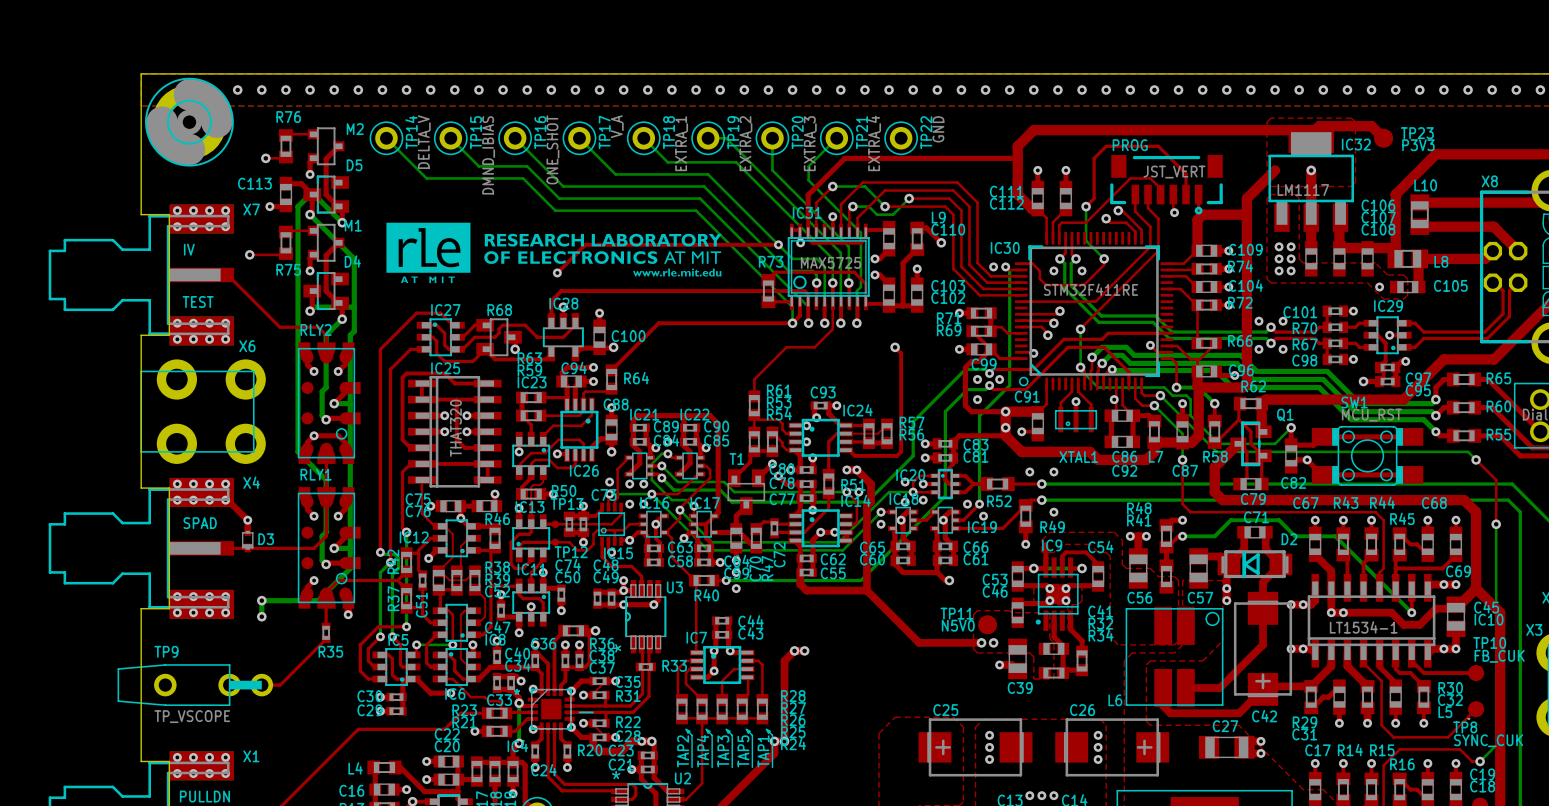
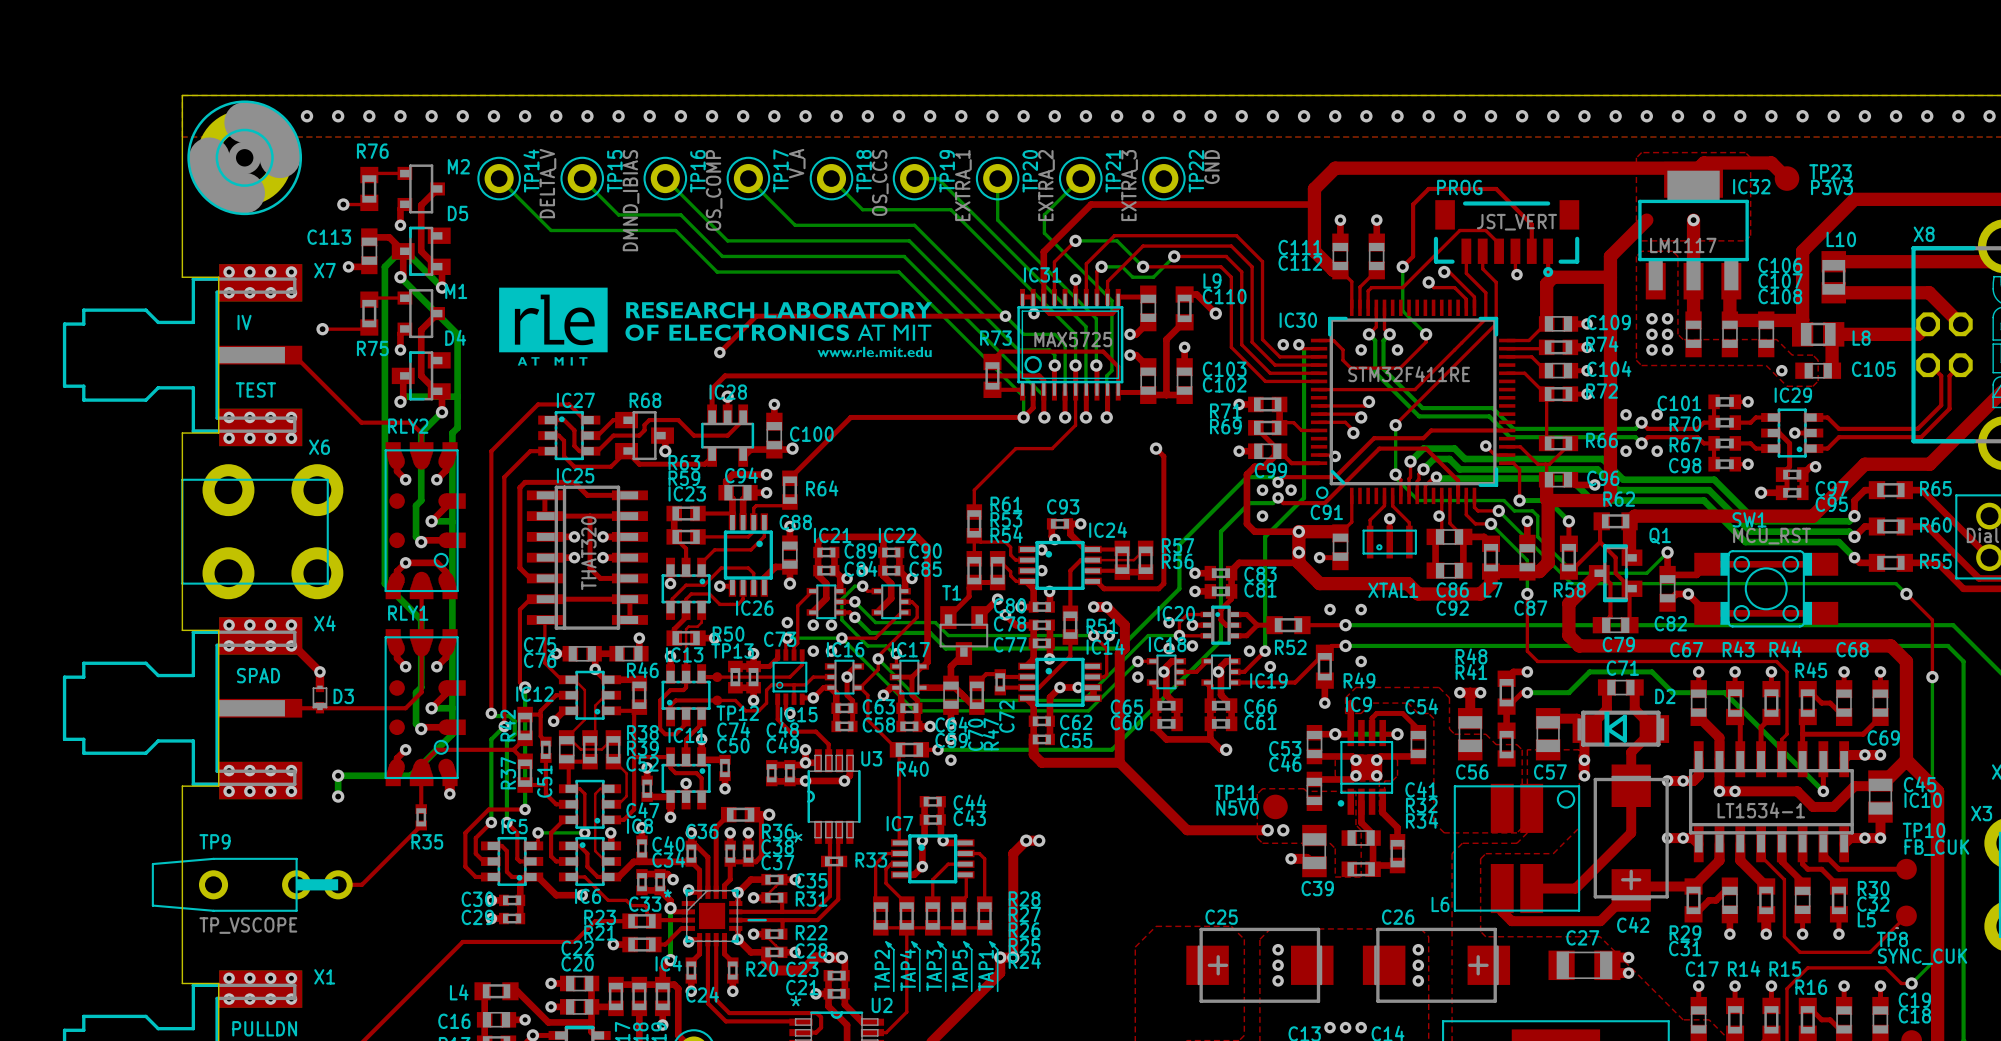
TP18 value: EXTRA_1 (681, 143) -> OS_CCS (880, 182)
TP19 value: EXTRA_2 (745, 143) -> EXTRA_1 (963, 185)
TP20 value: EXTRA_3 (810, 143) -> EXTRA_2 (1046, 185)
TP21 value: EXTRA_4 (874, 143) -> EXTRA_3 (1129, 185)
TP16 value: ONE_SHOT (552, 149) -> OS_COMP (714, 190)

